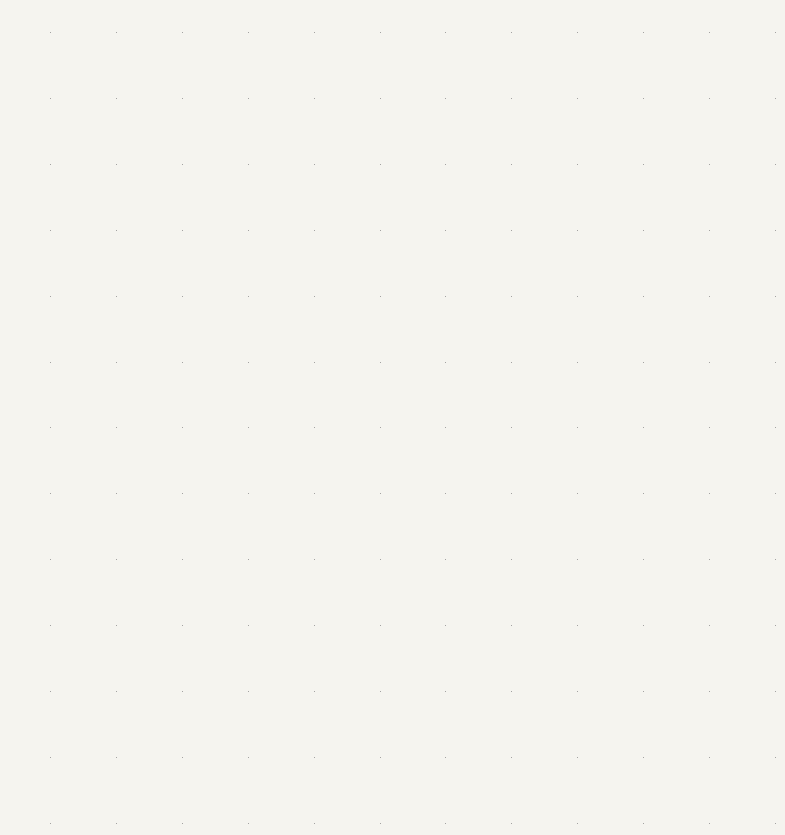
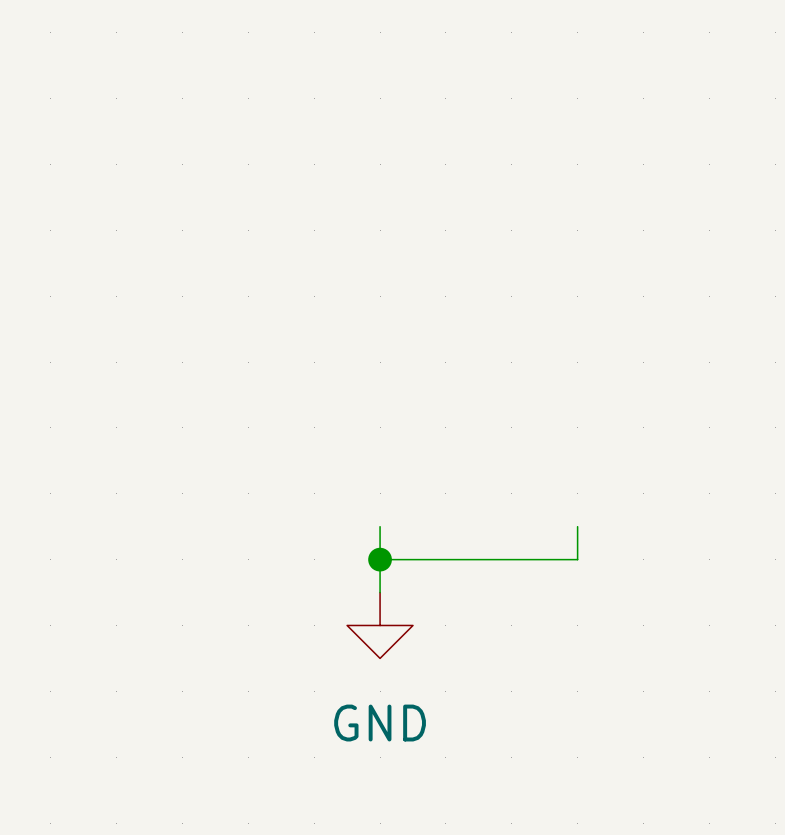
wire: none -> (380, 526) (380, 592)
wire: none -> (577, 526) (577, 559) (380, 559)
junction: none -> (380, 559)
power symbol: none -> GND (380, 625)

